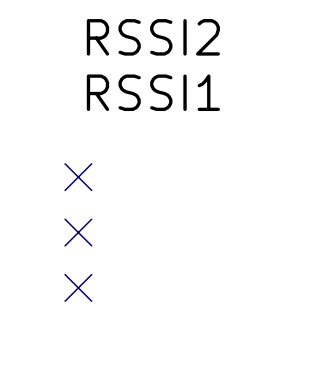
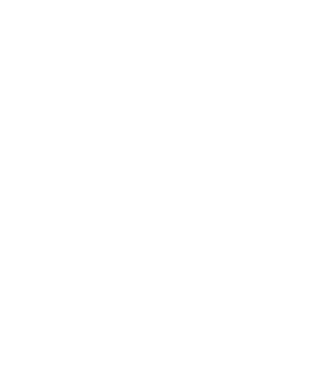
label: RSSI2 (153, 37) -> none
label: RSSI1 (153, 92) -> none
no-connect mark: (78, 177) -> none
no-connect mark: (78, 232) -> none
no-connect mark: (78, 287) -> none

